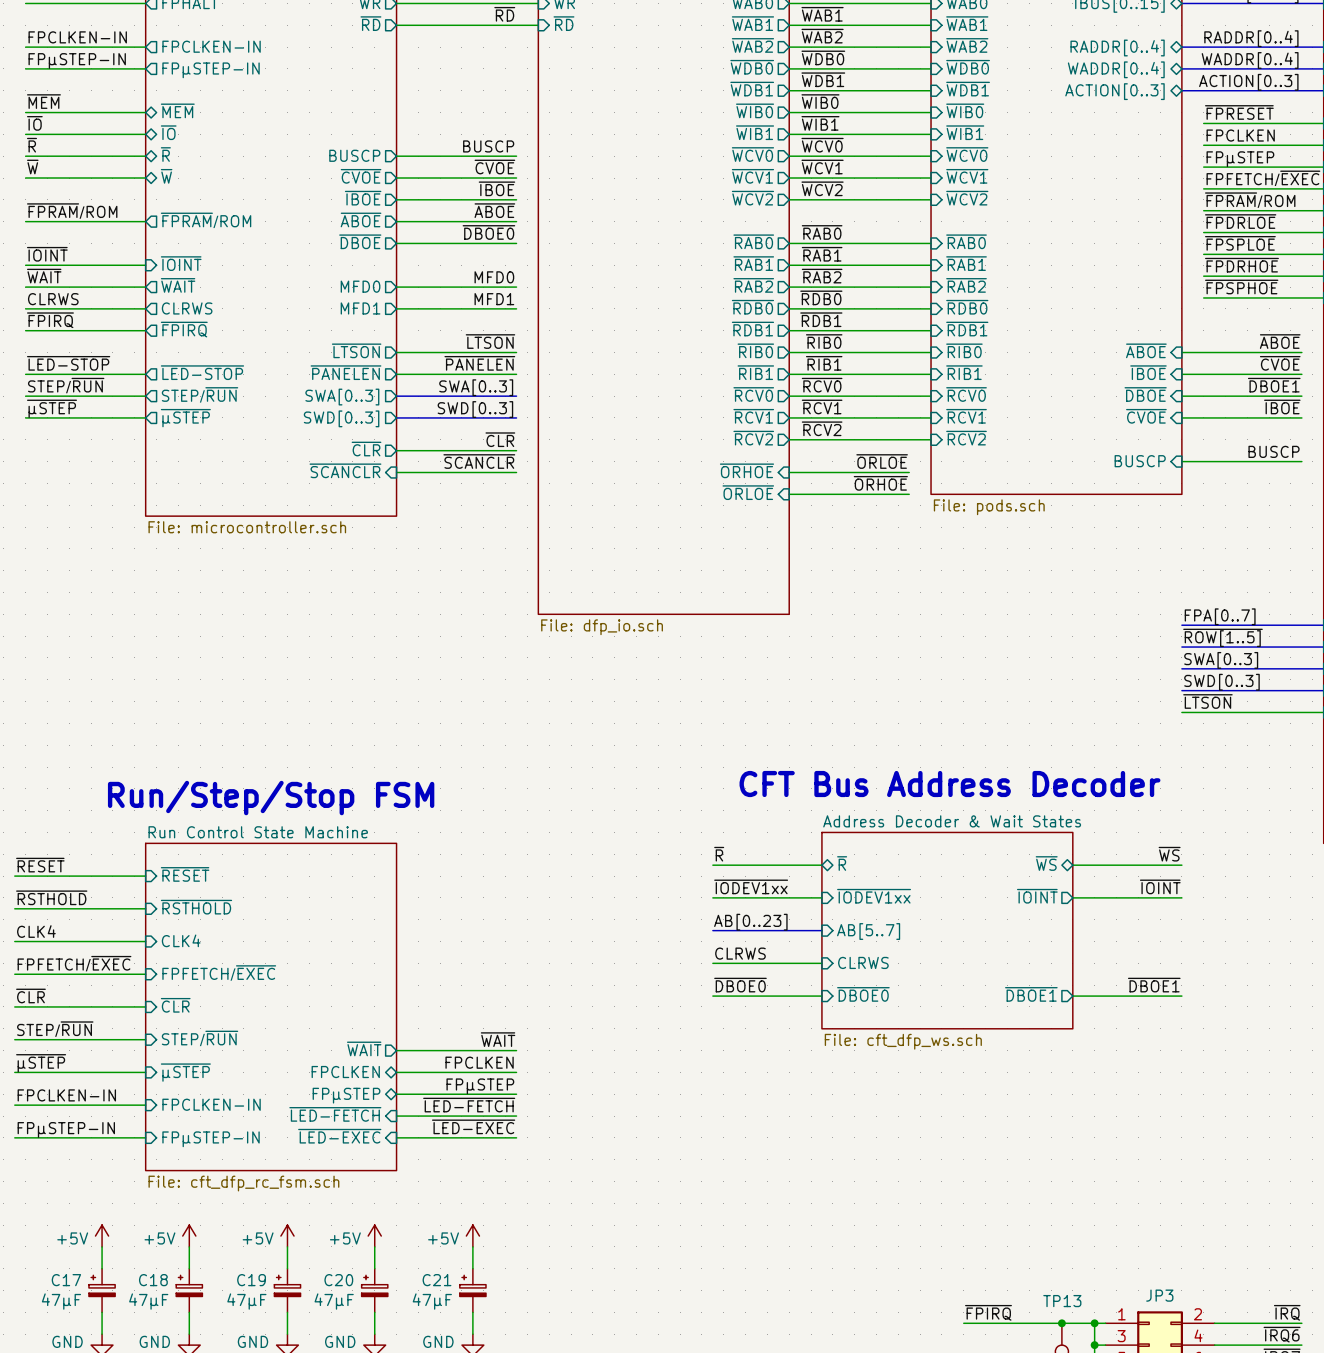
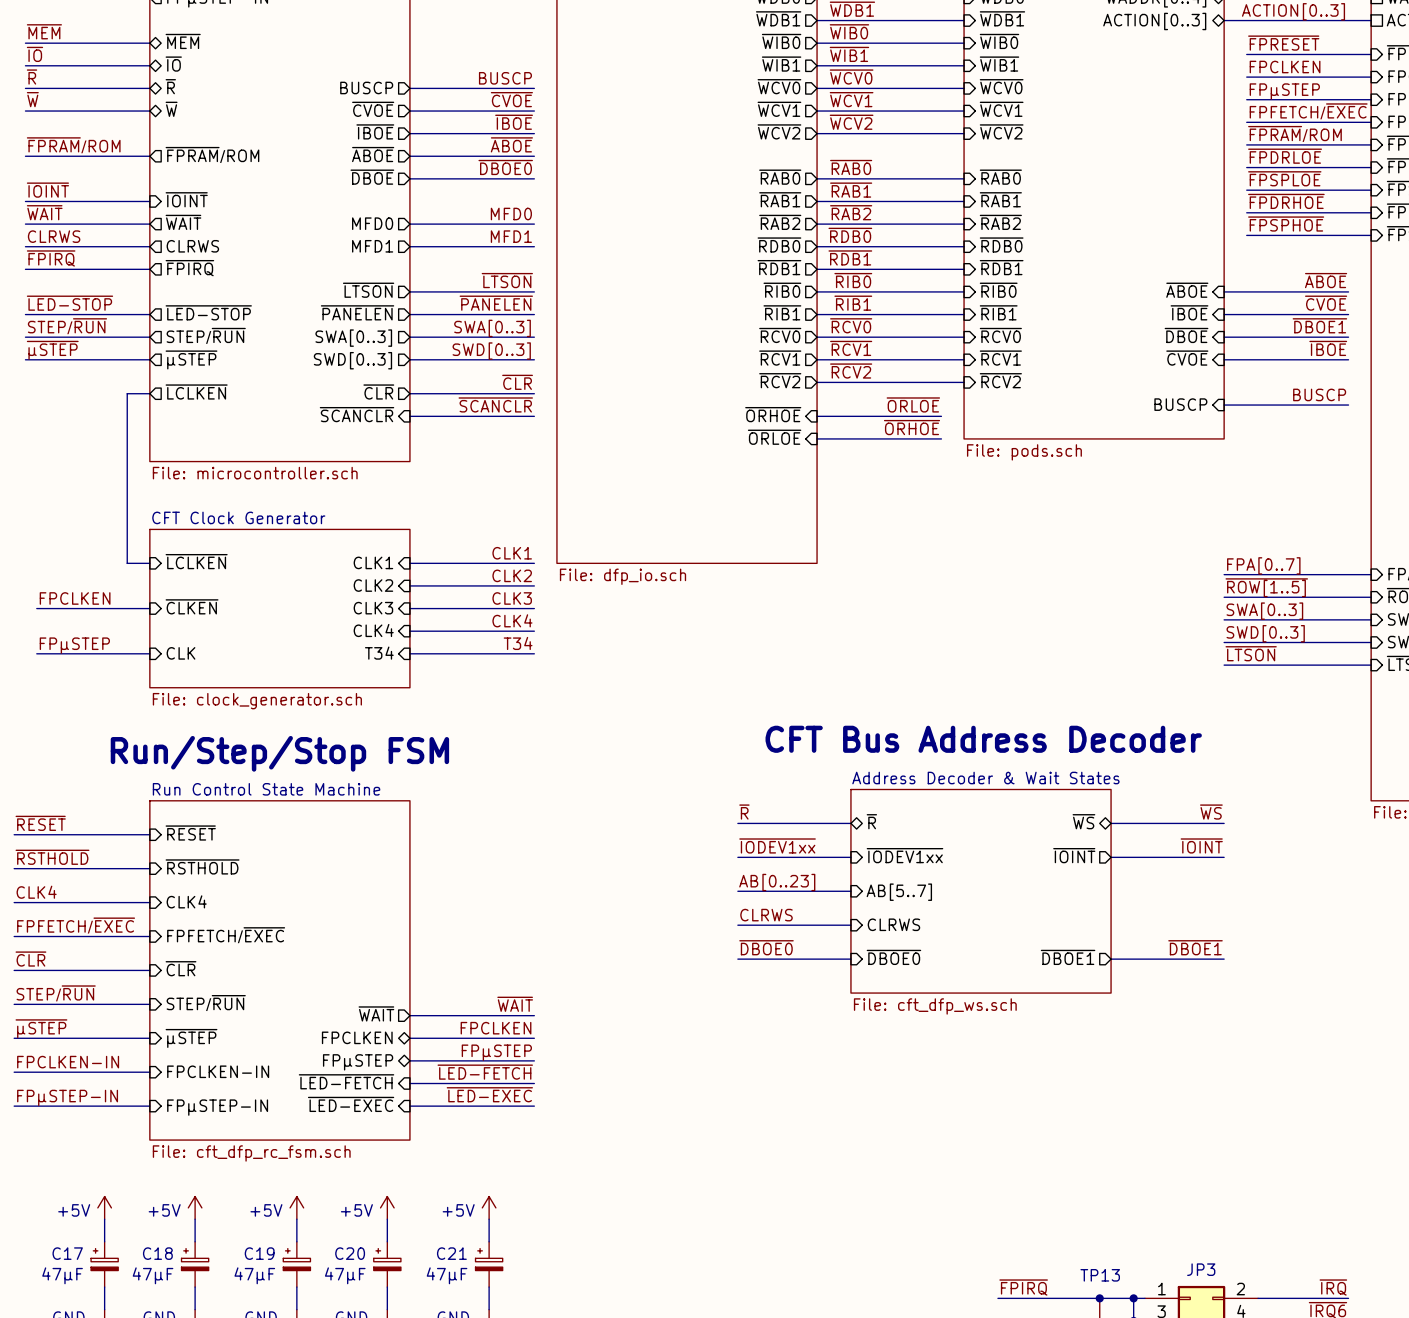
sheet pin: none -> ~{LCLKEN} (196, 392)
wire: none -> (149, 393) (127, 393) (127, 563) (149, 563)
label: none -> CLK1 (512, 553)
sheet pin: none -> ~{LCLKEN} (196, 561)
sheet pin: none -> CLK1 (373, 562)
wire: none -> (409, 563) (534, 563)
label: none -> CLK2 (512, 575)
sheet pin: none -> CLK2 (373, 585)
wire: none -> (409, 585) (534, 585)
label: none -> FPCLKEN (75, 598)
label: none -> CLK3 (512, 598)
sheet pin: none -> ~{CLKEN} (192, 606)
wire: none -> (36, 608) (149, 608)
sheet CFT Clock Generator: none -> File: clock_generator.sch (279, 608)
sheet pin: none -> CLK3 (373, 608)
wire: none -> (409, 608) (534, 608)
label: none -> CLK4 (512, 620)
sheet pin: none -> CLK4 (373, 630)
wire: none -> (409, 631) (534, 631)
label: none -> T34 (518, 643)
label: none -> FPµSTEP (74, 645)
sheet pin: none -> T34 (379, 653)
wire: none -> (36, 653) (149, 653)
sheet pin: none -> CLK (181, 653)
wire: none -> (409, 653) (534, 653)

